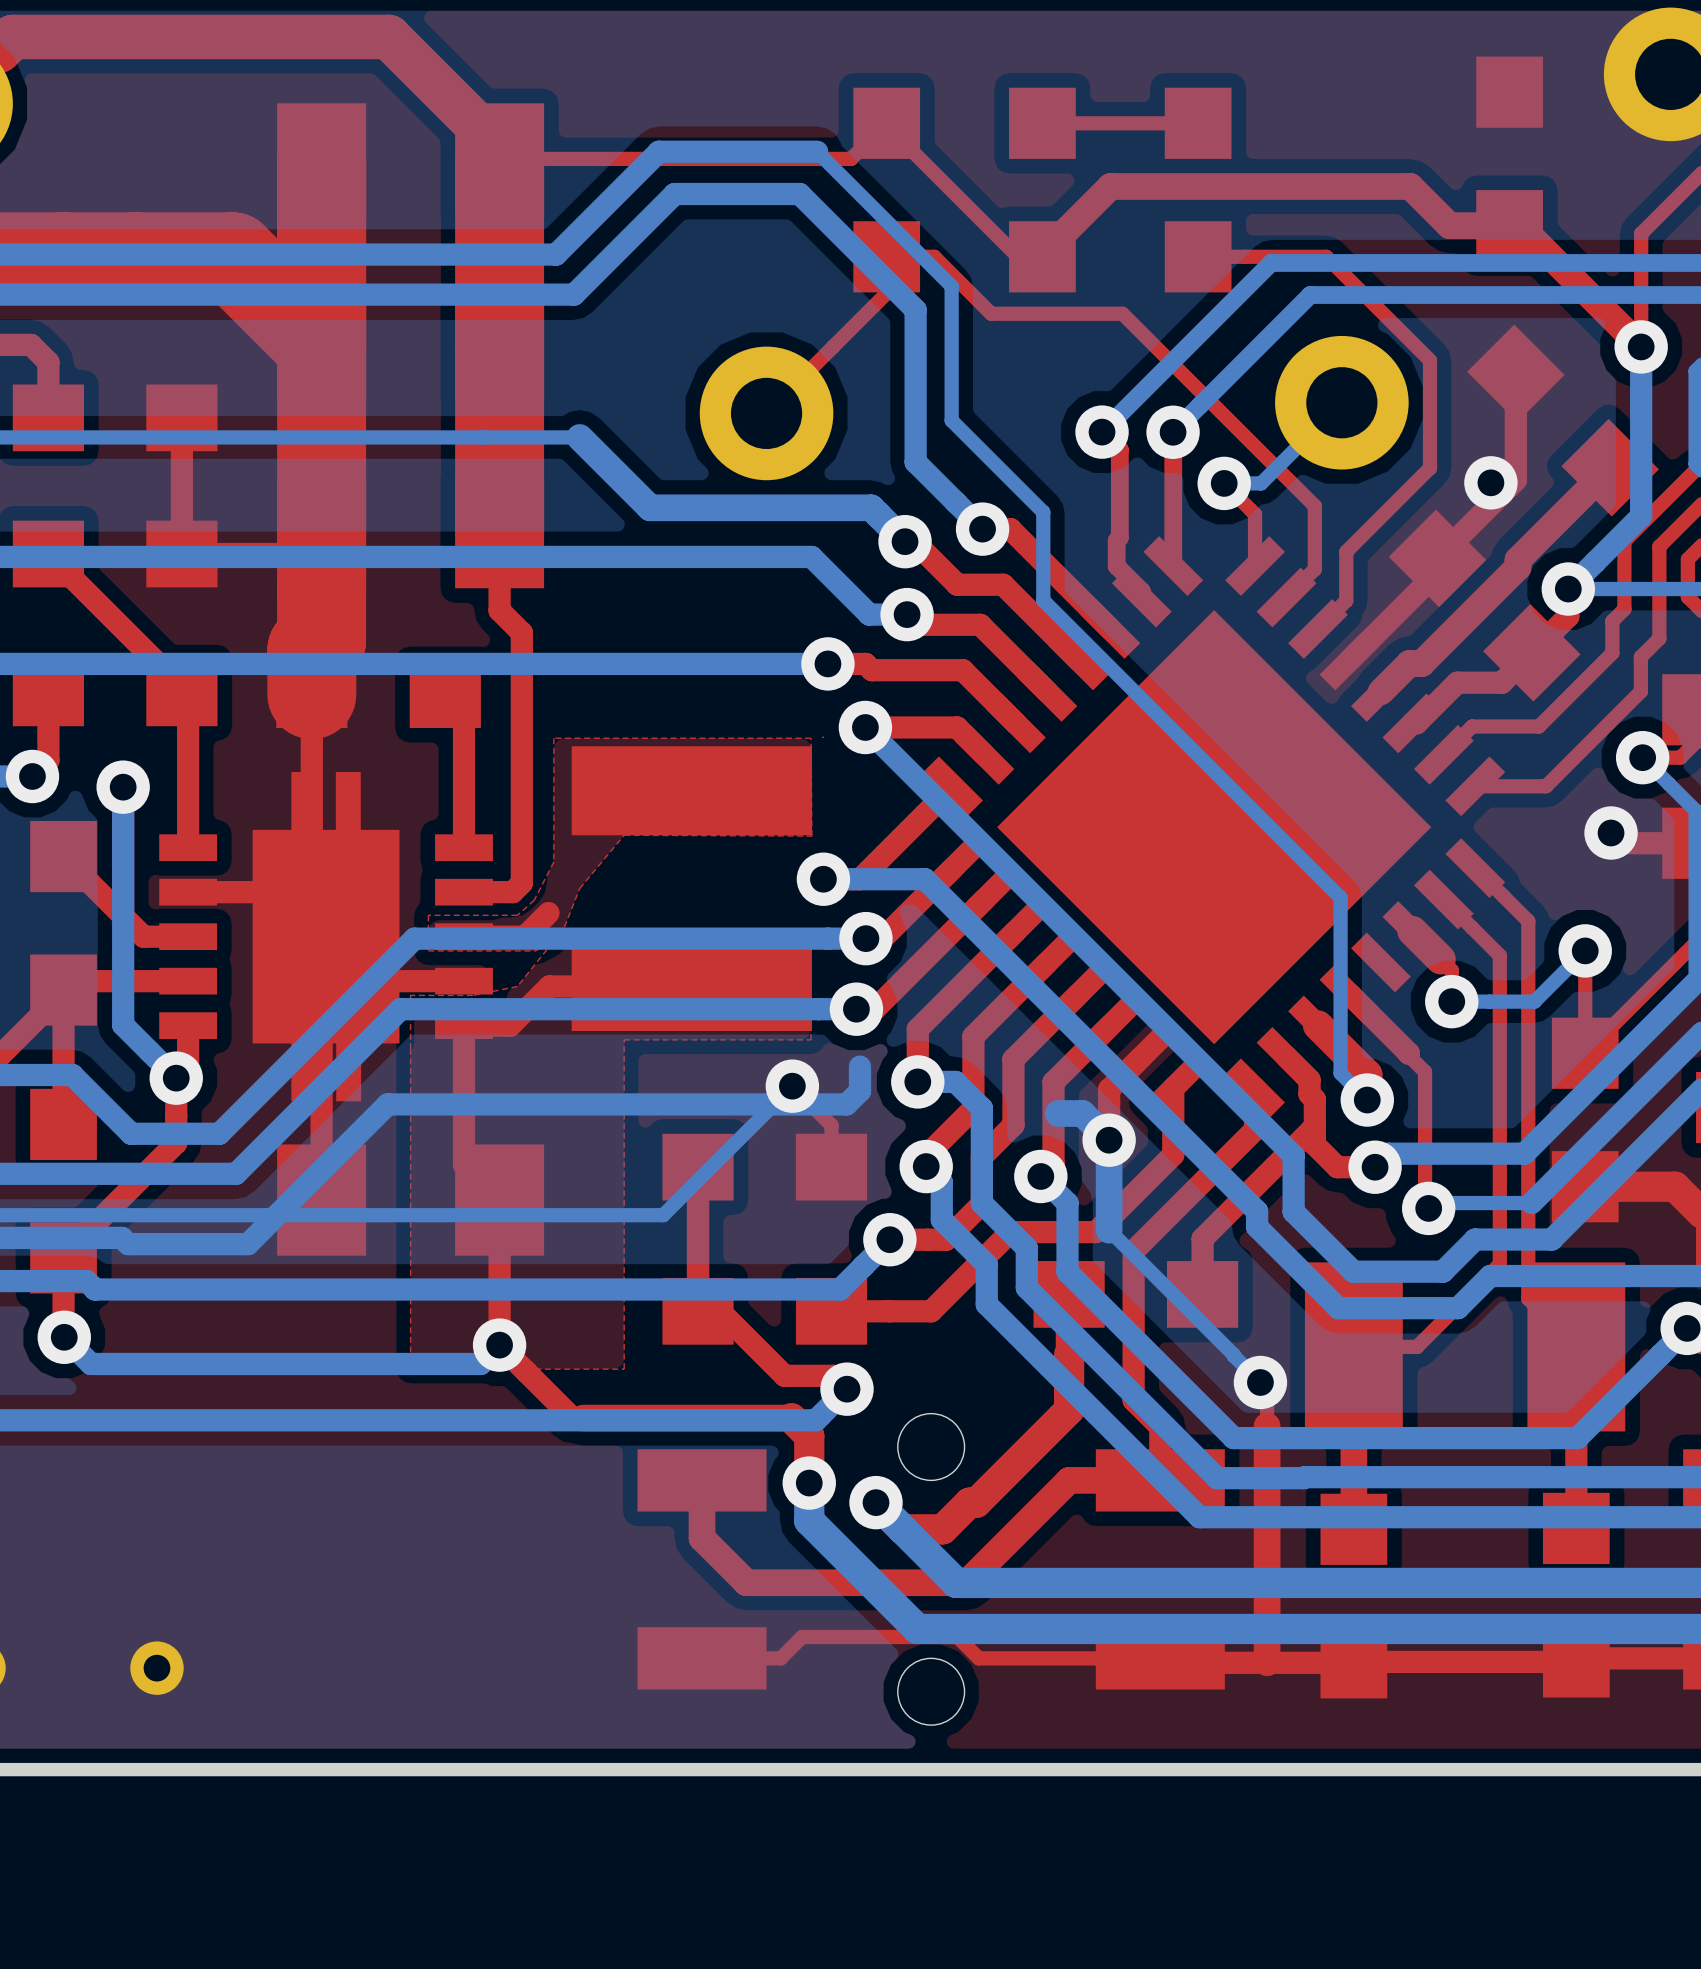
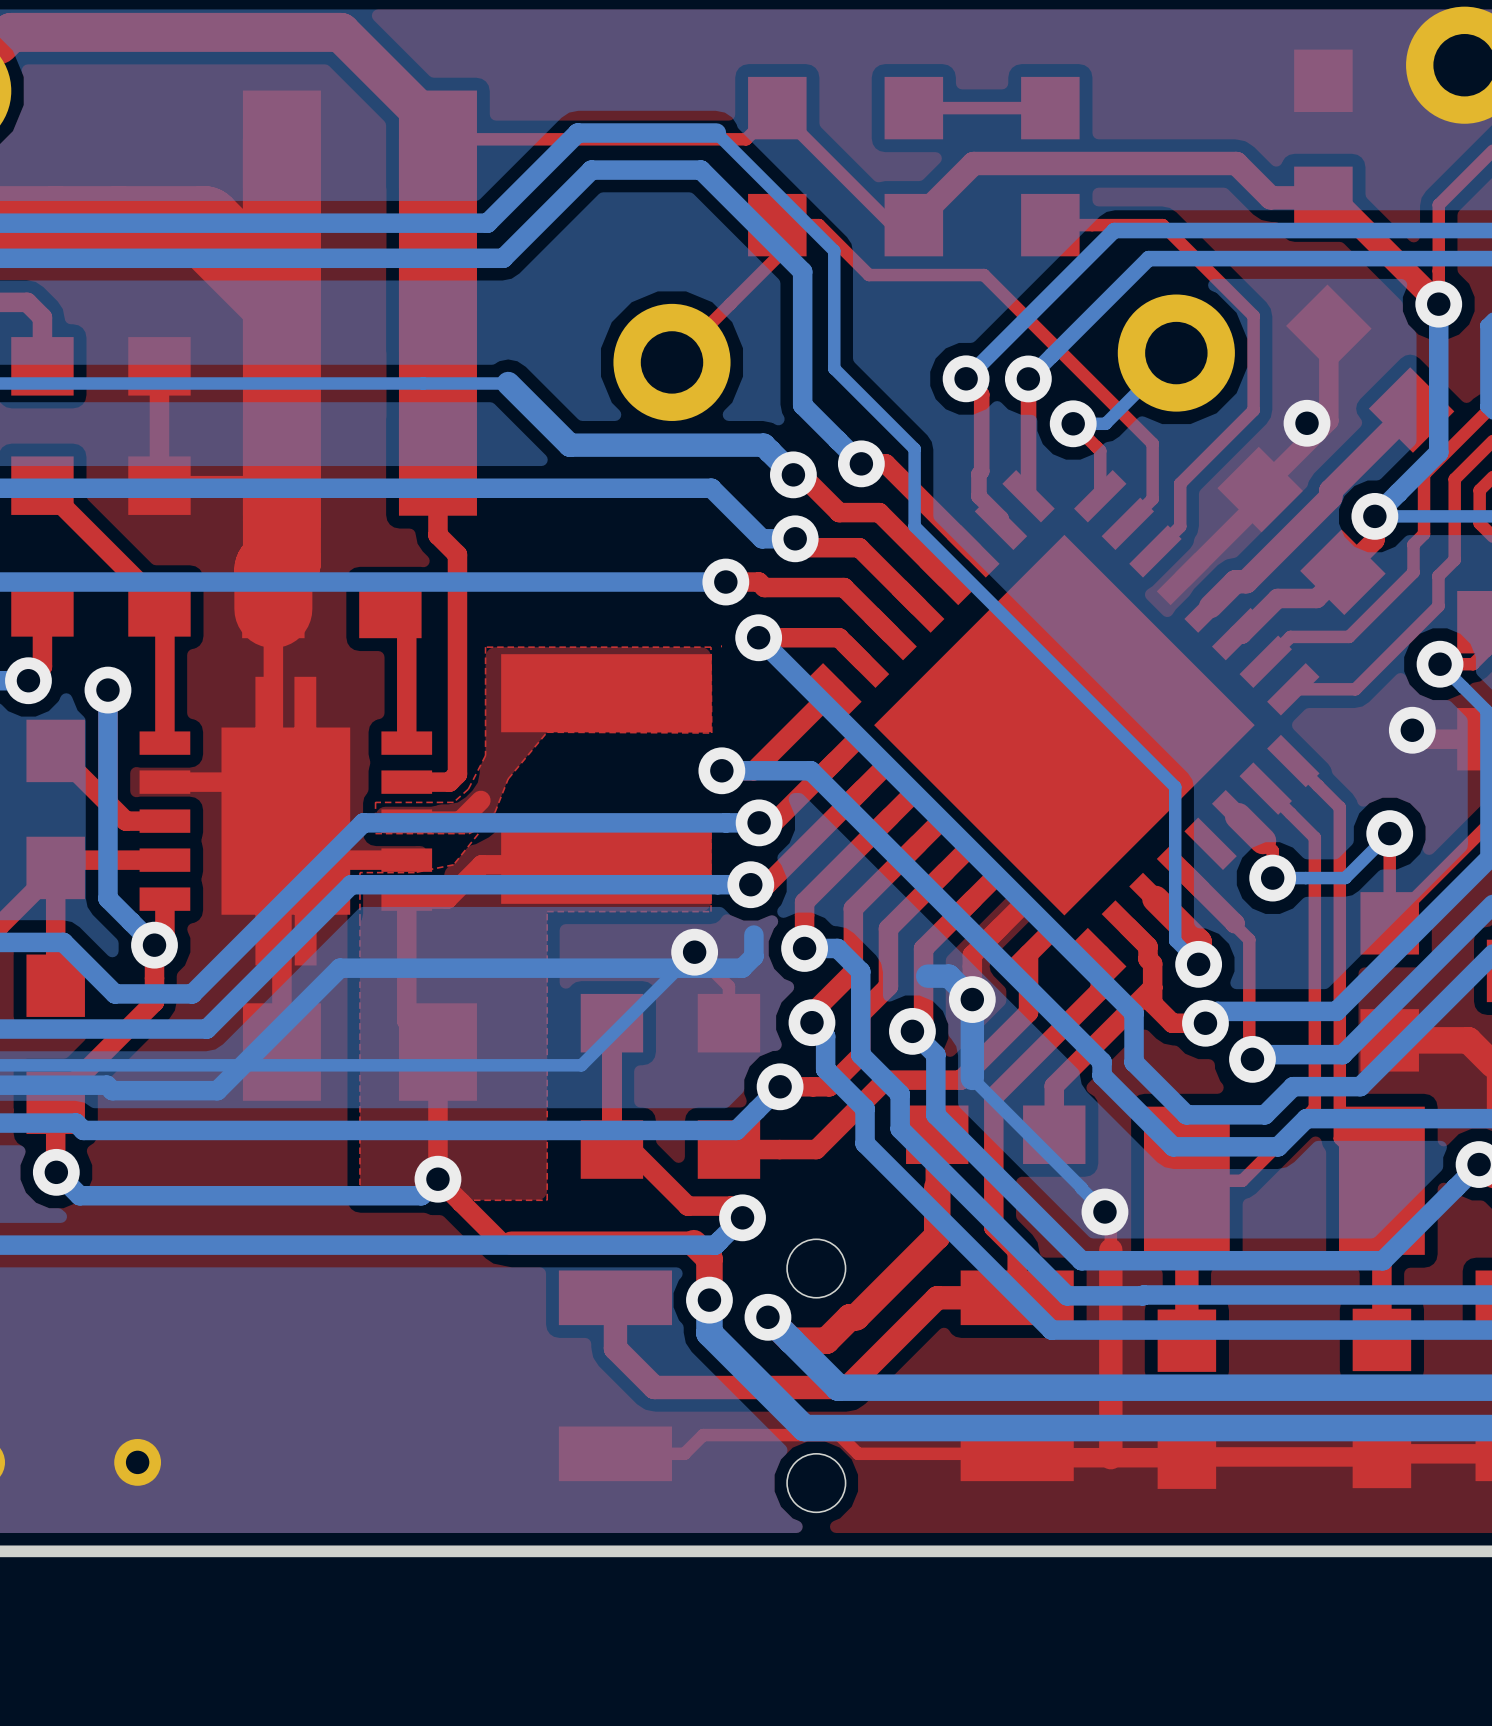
bottom track width: thin (1531, 1203) (1434, 1203) -> thick (1342, 1054) (1257, 1054)

